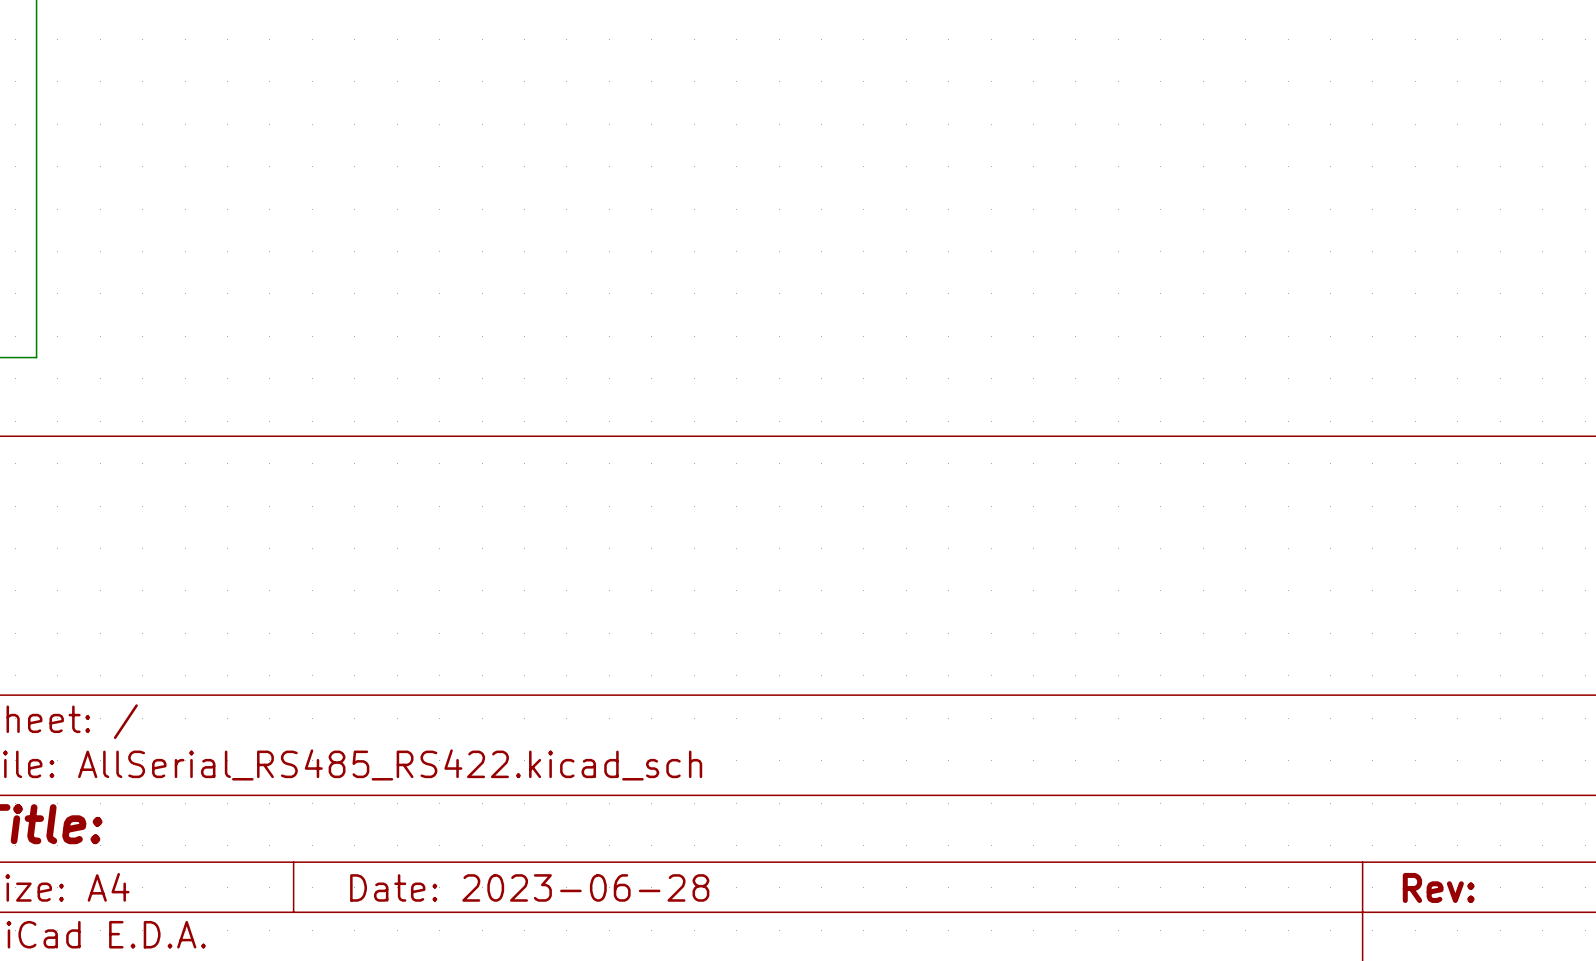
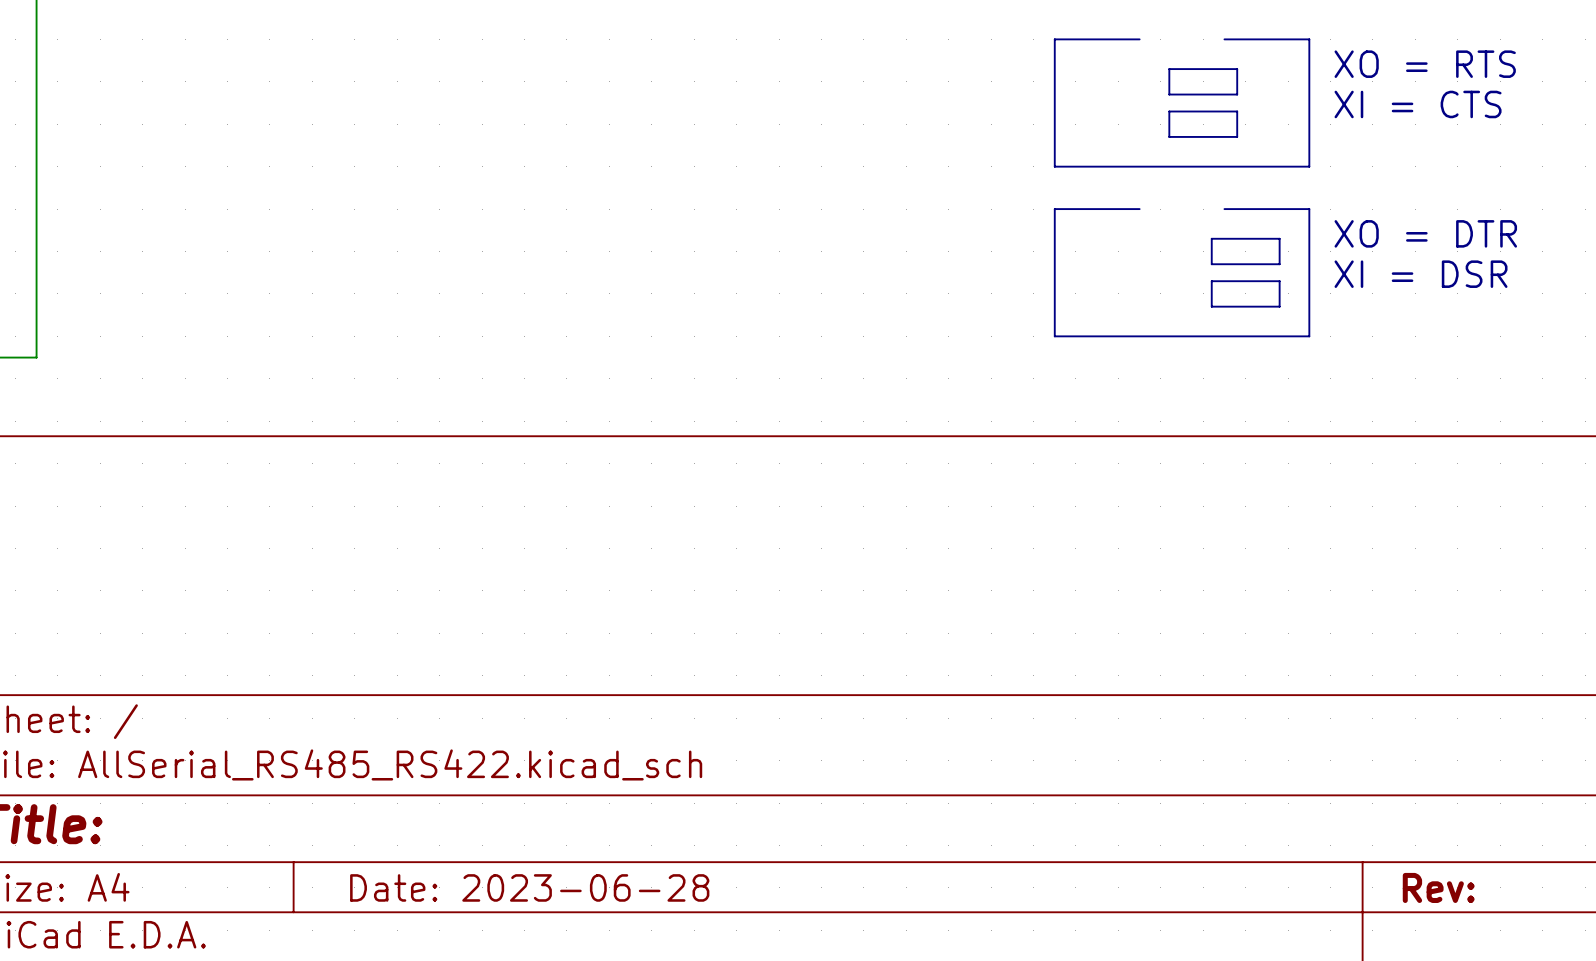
line: none -> (1139, 39) (1054, 39) (1054, 166) (1309, 166) (1309, 39) (1224, 39)
text: none -> XO = RTS (1425, 64)
line: none -> (1169, 69) (1169, 94) (1237, 94) (1237, 69) (1169, 69)
text: none -> XI = CTS (1418, 104)
line: none -> (1169, 111) (1237, 111) (1237, 136) (1169, 136) (1169, 111)
line: none -> (1139, 209) (1054, 209) (1054, 336) (1309, 336) (1309, 209) (1224, 209)
text: none -> XO = DTR (1425, 233)
line: none -> (1211, 238) (1279, 238) (1279, 264) (1211, 264) (1211, 238)
text: none -> XI = DSR (1421, 274)
line: none -> (1211, 281) (1211, 306) (1279, 306) (1279, 281) (1211, 281)

